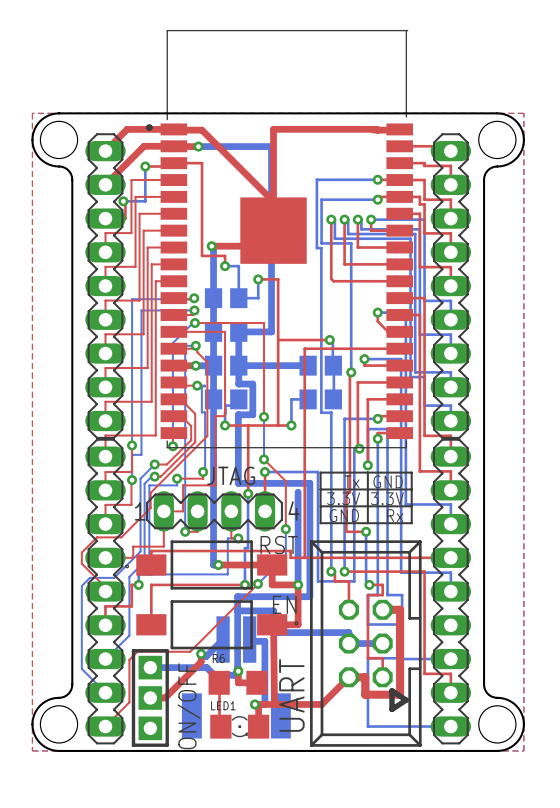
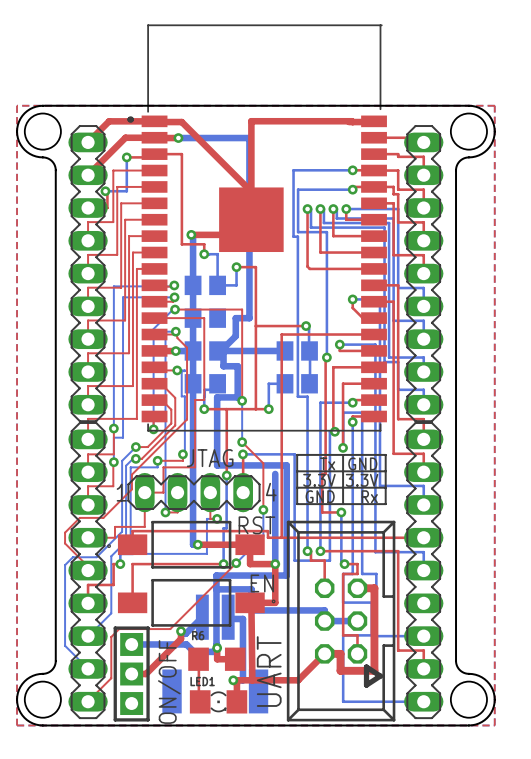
bottom track: (257, 331) (238, 331) (238, 384) (252, 384) (252, 414) (238, 414) -> (235, 318) (235, 336) (223, 348) (223, 366) (237, 366) (237, 397) (217, 398)

